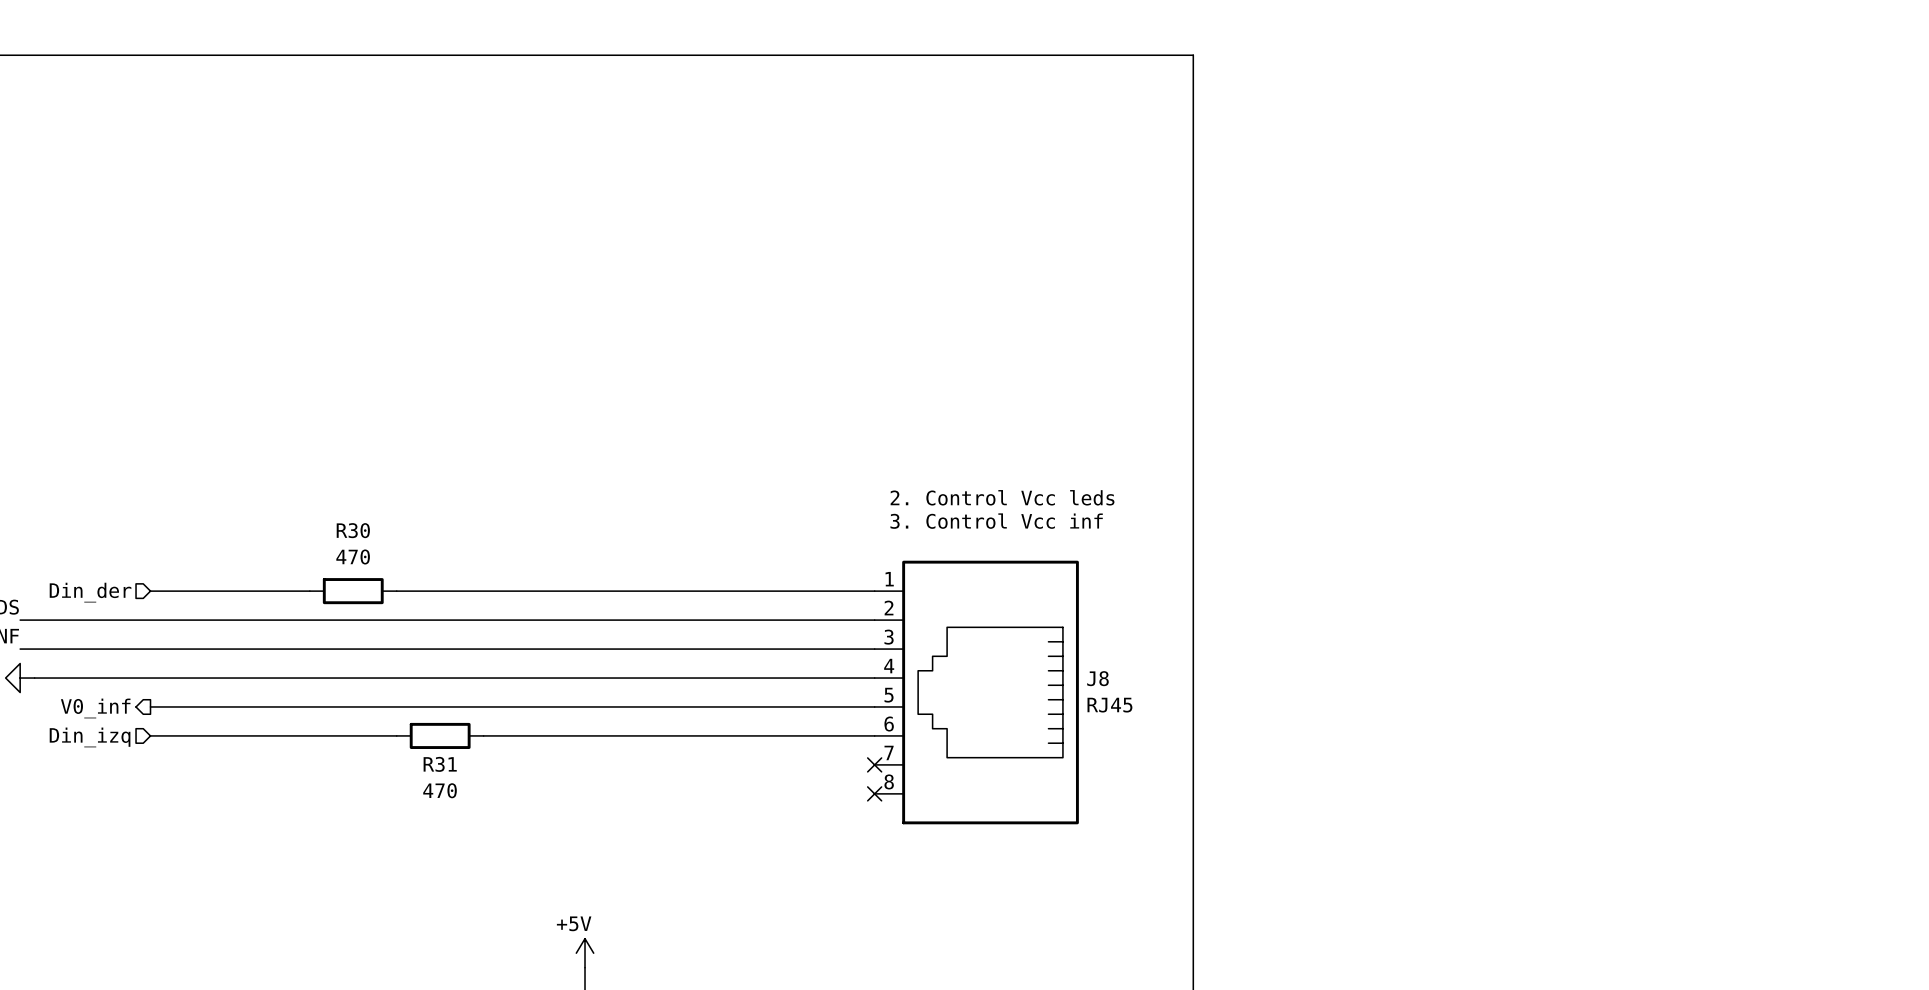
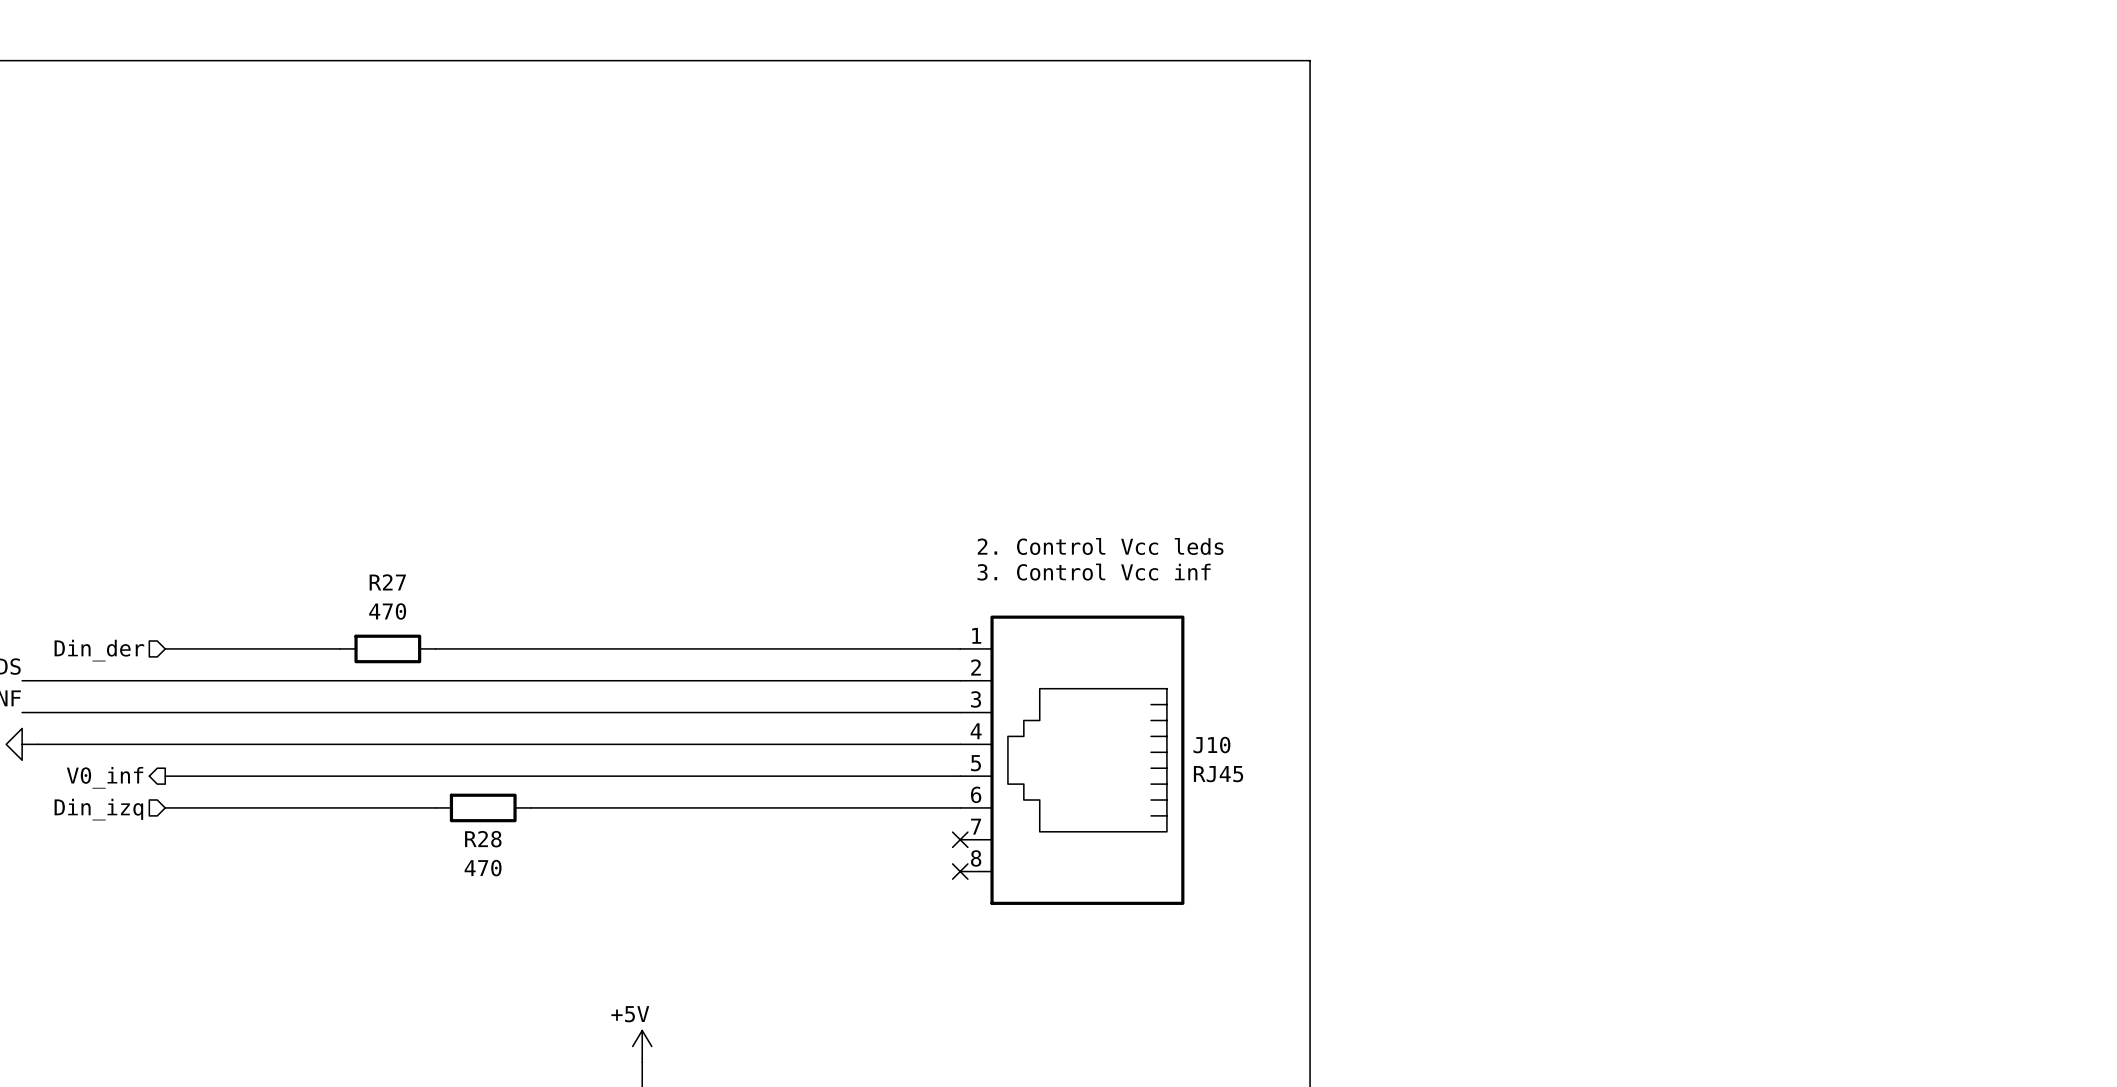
R30 name: R30 (353, 530) -> R27 (387, 582)
J8 name: J8 (1097, 678) -> J10 (1211, 745)
R31 name: R31 (440, 764) -> R28 (483, 839)

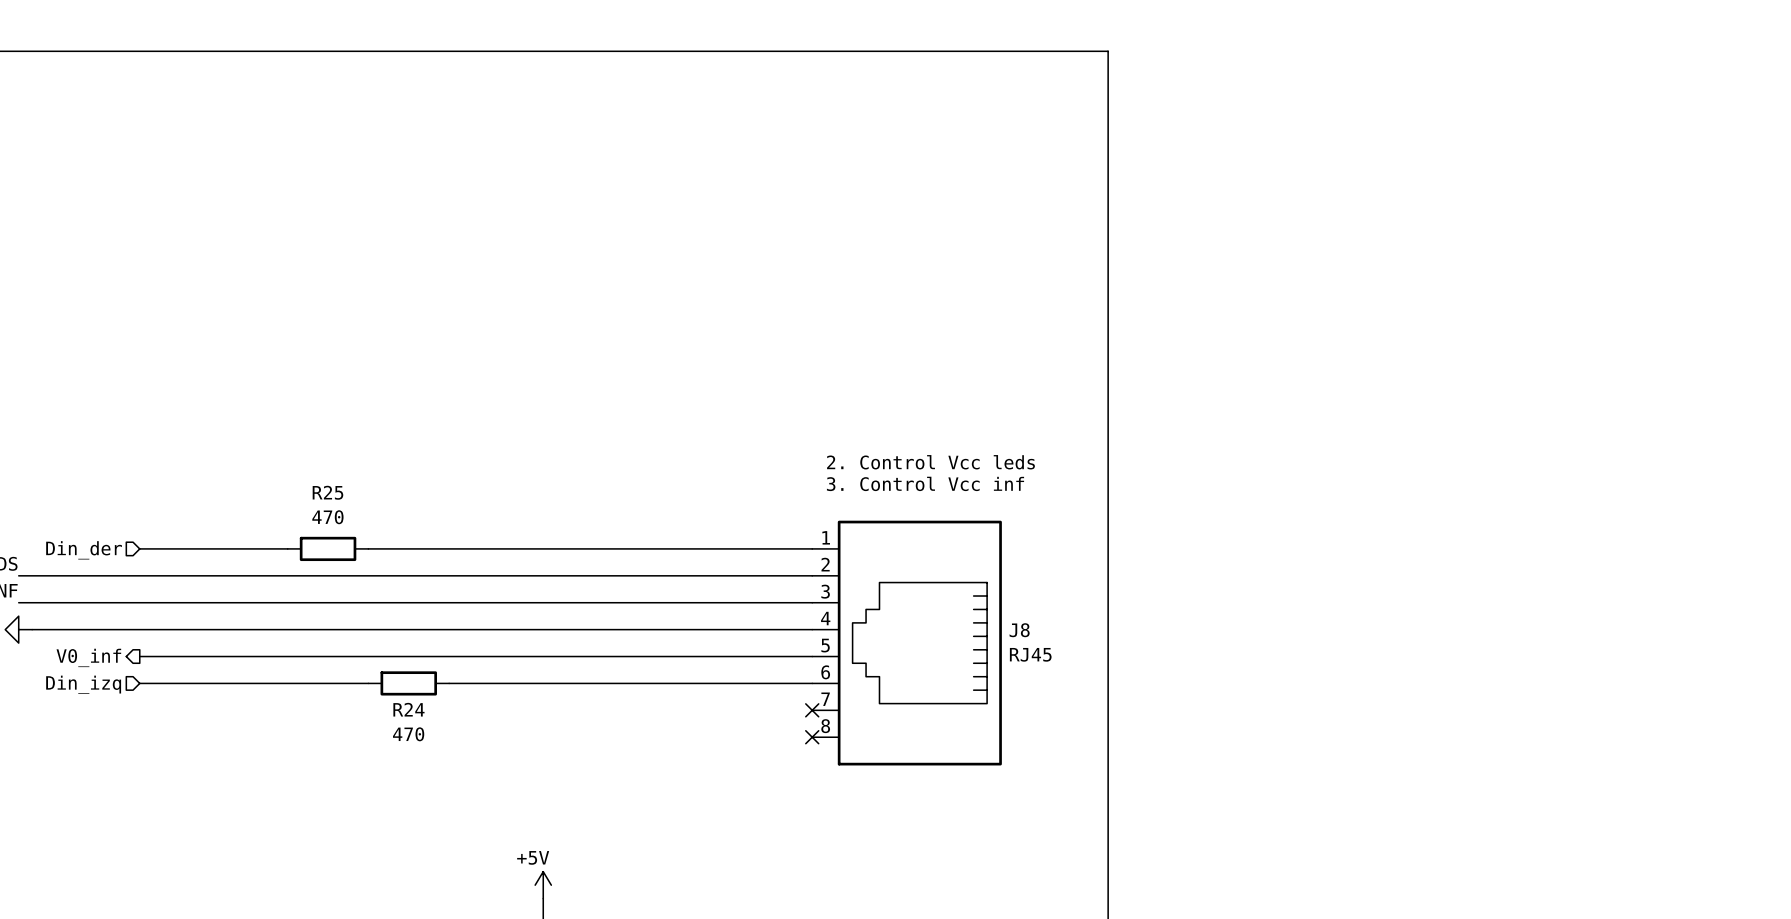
R27 name: R27 (387, 582) -> R25 (327, 492)
J10 name: J10 (1211, 745) -> J8 (1019, 630)
R28 name: R28 (483, 839) -> R24 (408, 709)

